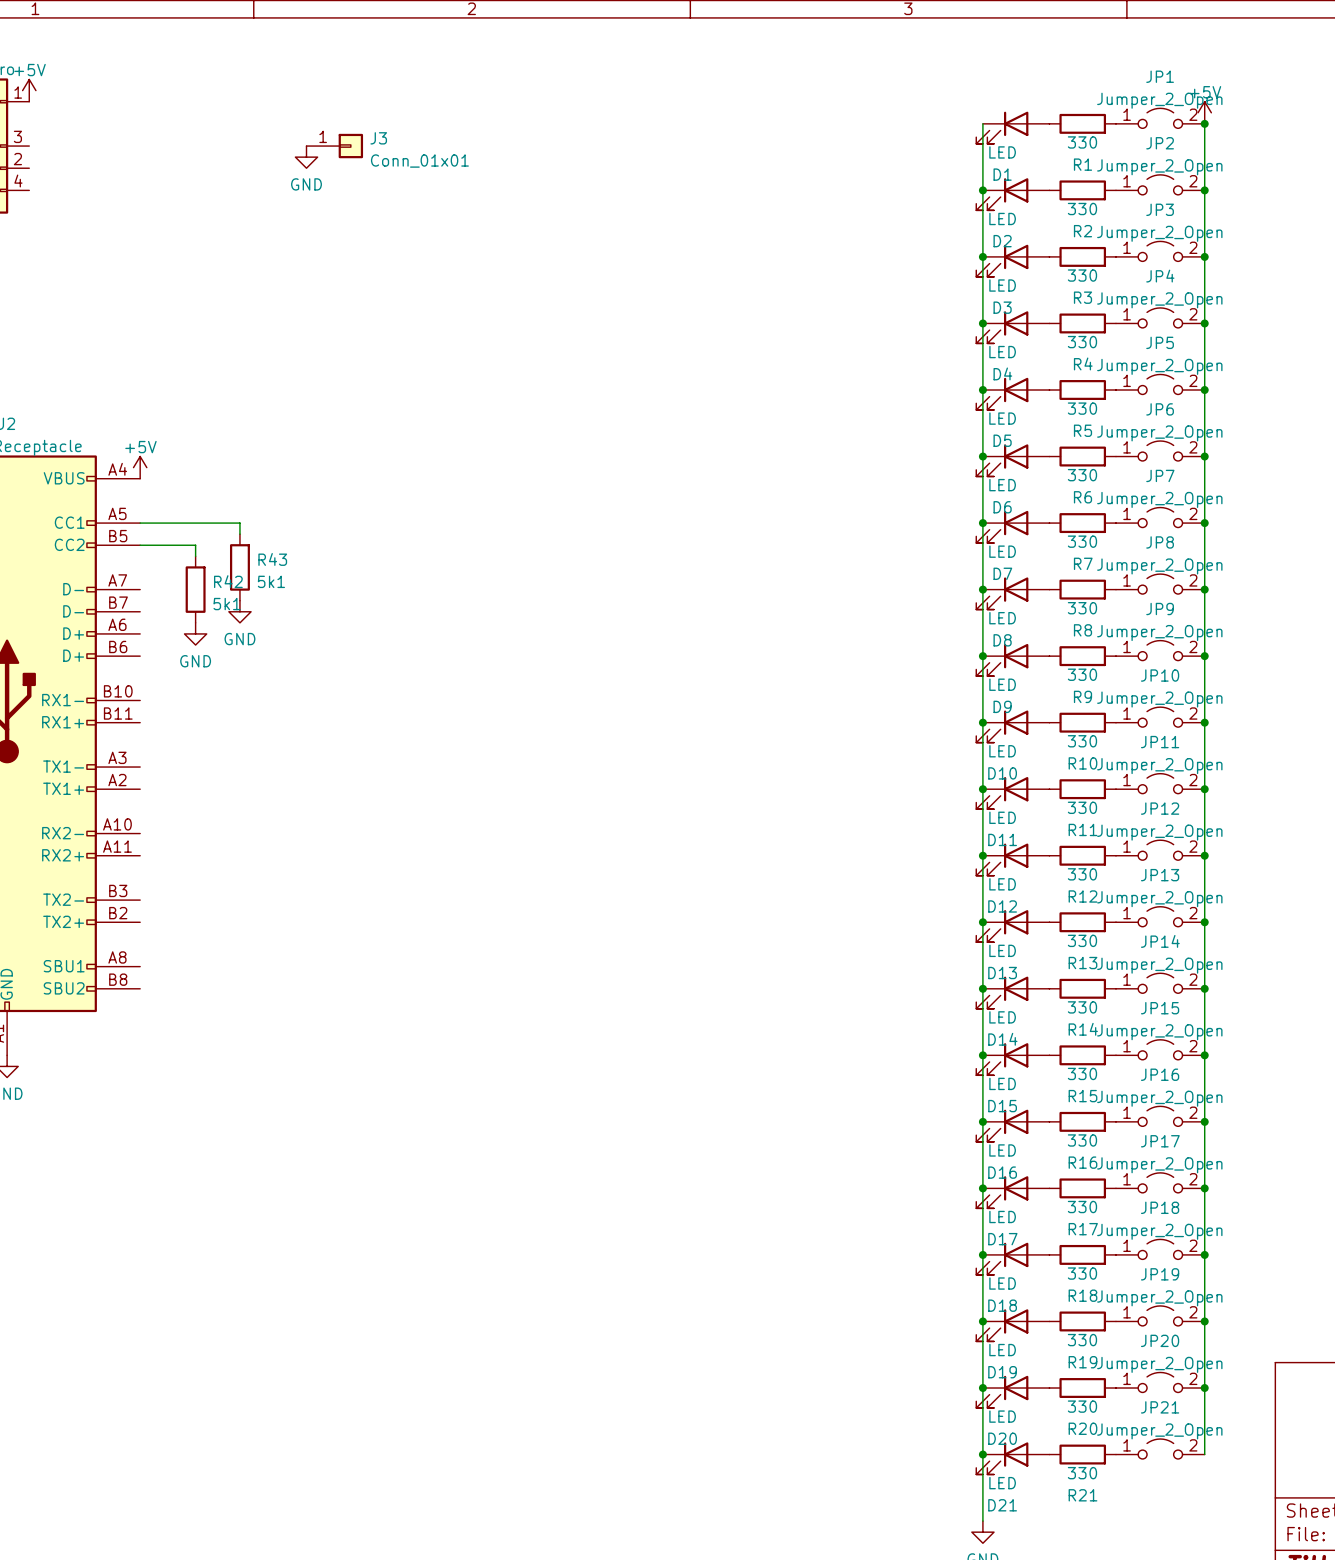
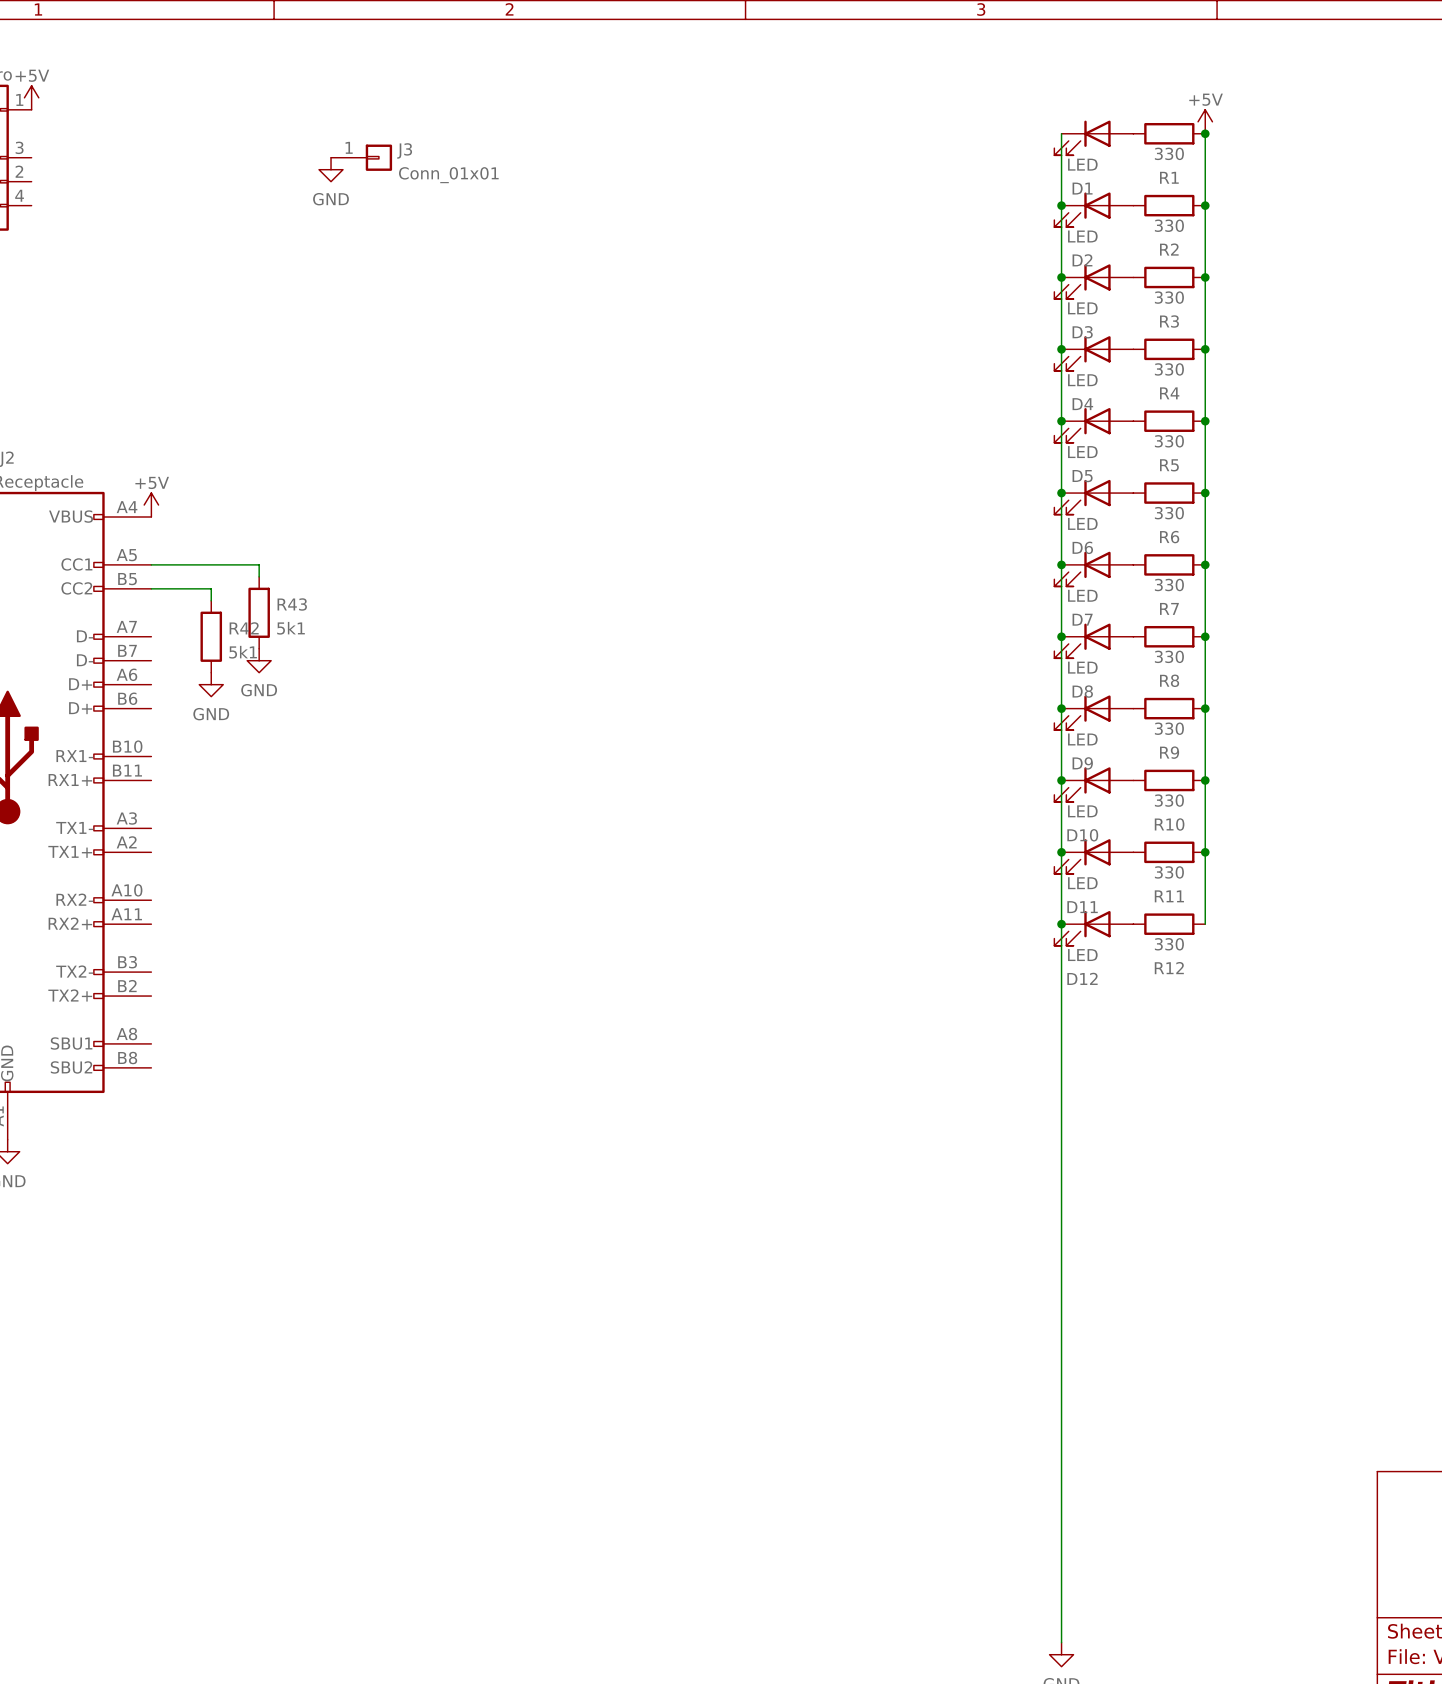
power symbol position: +5V (1204, 112) -> +5V (1205, 121)
JP1: Jumper_2_Open (1160, 118) -> none
wire: none -> (1205, 133) (1205, 924)
junction: none -> (1205, 133)
wire: (1204, 123) (1204, 1454) -> none
junction: (1204, 123) -> none
JP2: Jumper_2_Open (1160, 184) -> none
junction: none -> (1205, 205)
junction: (1204, 190) -> none
JP3: Jumper_2_Open (1160, 251) -> none
junction: none -> (1205, 277)
junction: (1204, 256) -> none
JP4: Jumper_2_Open (1160, 317) -> none
junction: none -> (1205, 349)
junction: (1204, 323) -> none
JP5: Jumper_2_Open (1160, 384) -> none
junction: none -> (1205, 421)
junction: (1204, 390) -> none
JP6: Jumper_2_Open (1160, 450) -> none
junction: none -> (1205, 493)
junction: (1204, 456) -> none
JP7: Jumper_2_Open (1160, 517) -> none
junction: none -> (1205, 564)
junction: (1204, 523) -> none
JP8: Jumper_2_Open (1160, 584) -> none
junction: none -> (1205, 636)
junction: (1204, 589) -> none
JP9: Jumper_2_Open (1160, 650) -> none
junction: none -> (1205, 708)
junction: (1204, 656) -> none
JP10: Jumper_2_Open (1160, 717) -> none
junction: none -> (1205, 780)
junction: (1204, 722) -> none
JP11: Jumper_2_Open (1160, 783) -> none
junction: none -> (1205, 852)
junction: (1204, 789) -> none
JP12: Jumper_2_Open (1160, 850) -> none
junction: (1204, 855) -> none
JP13: Jumper_2_Open (1160, 916) -> none
junction: (982, 922) -> none
R13: 330 (1082, 922) -> none
junction: (1204, 922) -> none
D13: LED (1012, 926) -> none
JP14: Jumper_2_Open (1160, 983) -> none
junction: (982, 988) -> none
R14: 330 (1082, 988) -> none
junction: (1204, 988) -> none
D14: LED (1012, 992) -> none
JP15: Jumper_2_Open (1160, 1049) -> none
junction: (982, 1055) -> none
R15: 330 (1082, 1055) -> none
junction: (1204, 1055) -> none
D15: LED (1012, 1059) -> none
JP16: Jumper_2_Open (1160, 1116) -> none
junction: (982, 1121) -> none
R16: 330 (1082, 1121) -> none
junction: (1204, 1121) -> none
D16: LED (1012, 1125) -> none
JP17: Jumper_2_Open (1160, 1182) -> none
junction: (982, 1188) -> none
R17: 330 (1082, 1188) -> none
junction: (1204, 1188) -> none
D17: LED (1012, 1192) -> none
JP18: Jumper_2_Open (1160, 1249) -> none
junction: (982, 1254) -> none
R18: 330 (1082, 1254) -> none
junction: (1204, 1254) -> none
D18: LED (1012, 1258) -> none
JP19: Jumper_2_Open (1160, 1315) -> none
junction: (982, 1321) -> none
R19: 330 (1082, 1321) -> none
junction: (1204, 1321) -> none
D19: LED (1012, 1325) -> none
JP20: Jumper_2_Open (1160, 1382) -> none
junction: (982, 1388) -> none
R20: 330 (1082, 1388) -> none
junction: (1204, 1388) -> none
D20: LED (1012, 1391) -> none
JP21: Jumper_2_Open (1160, 1448) -> none
junction: (982, 1454) -> none
R21: 330 (1082, 1454) -> none
D21: LED (1012, 1458) -> none

